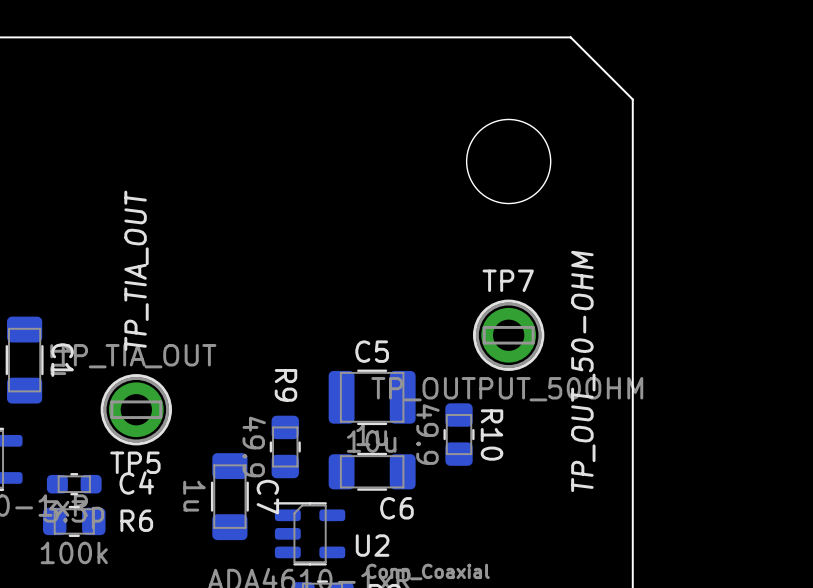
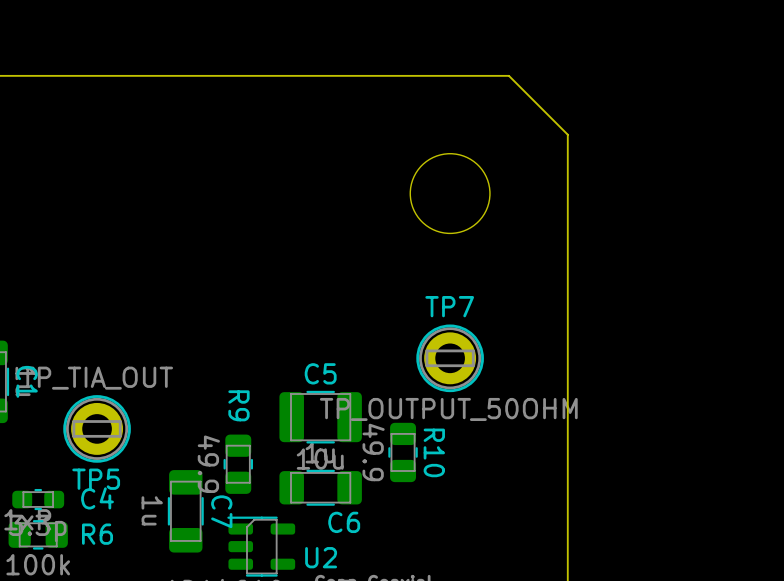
text: TP_TIA_OUT (136, 270) -> none
text: TP_OUT_50-OHM (583, 371) -> none

